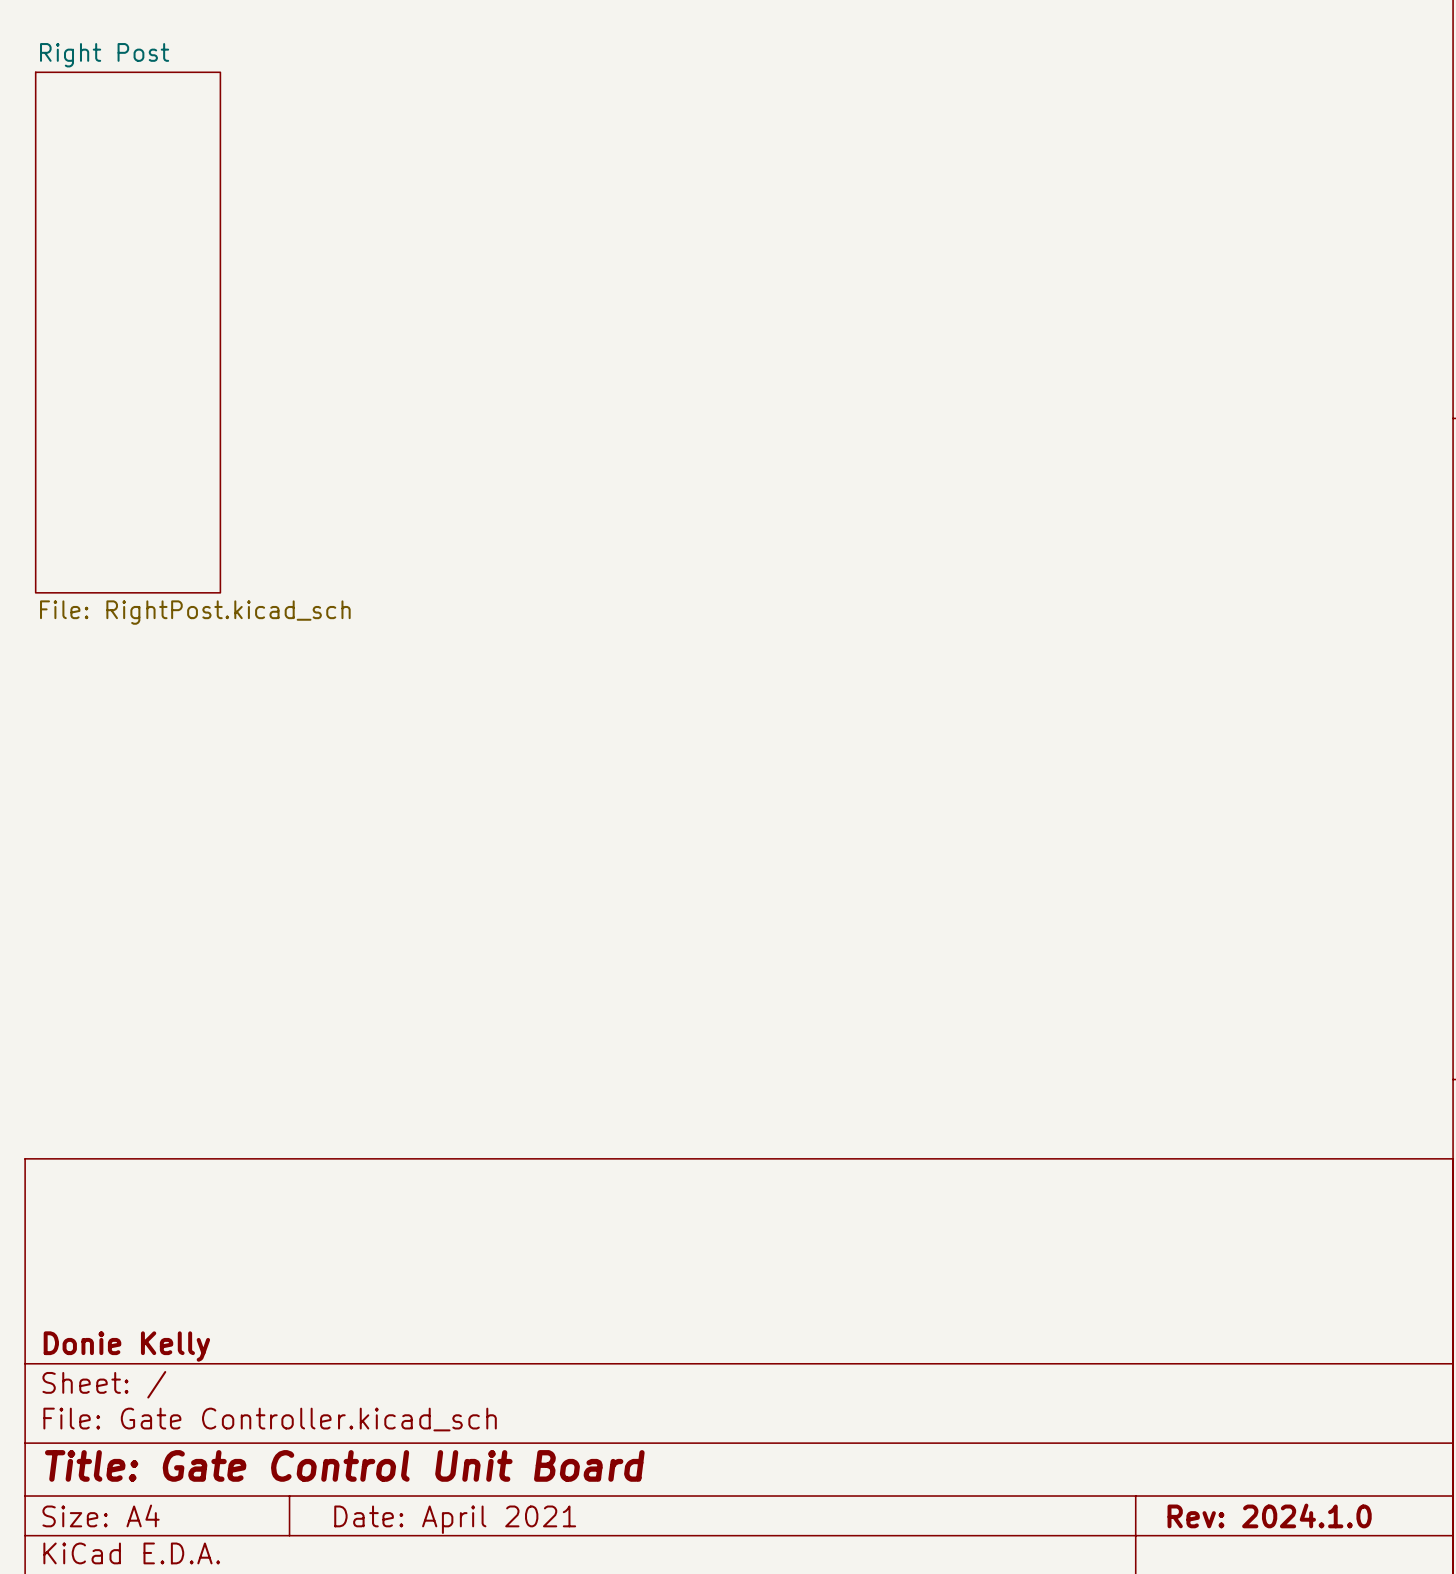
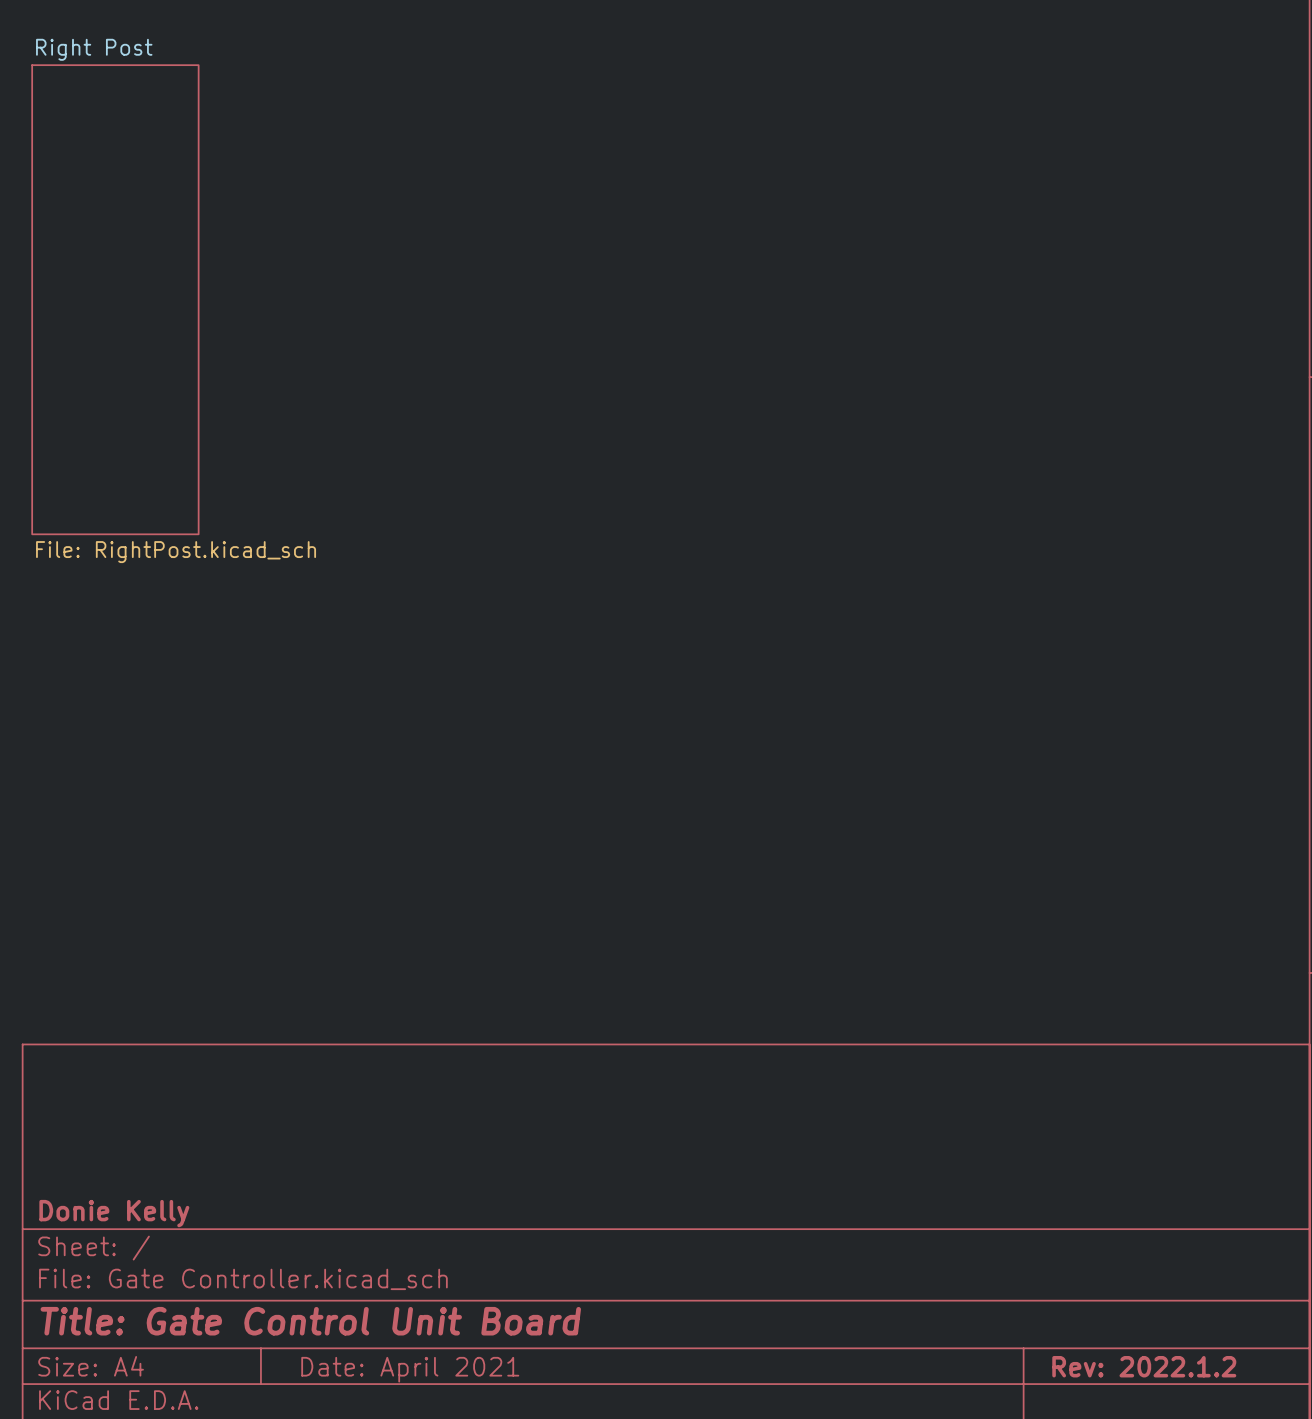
title block: Rev: 2024.1.0 (1269, 1515) -> Rev: 2022.1.2 (1144, 1366)

